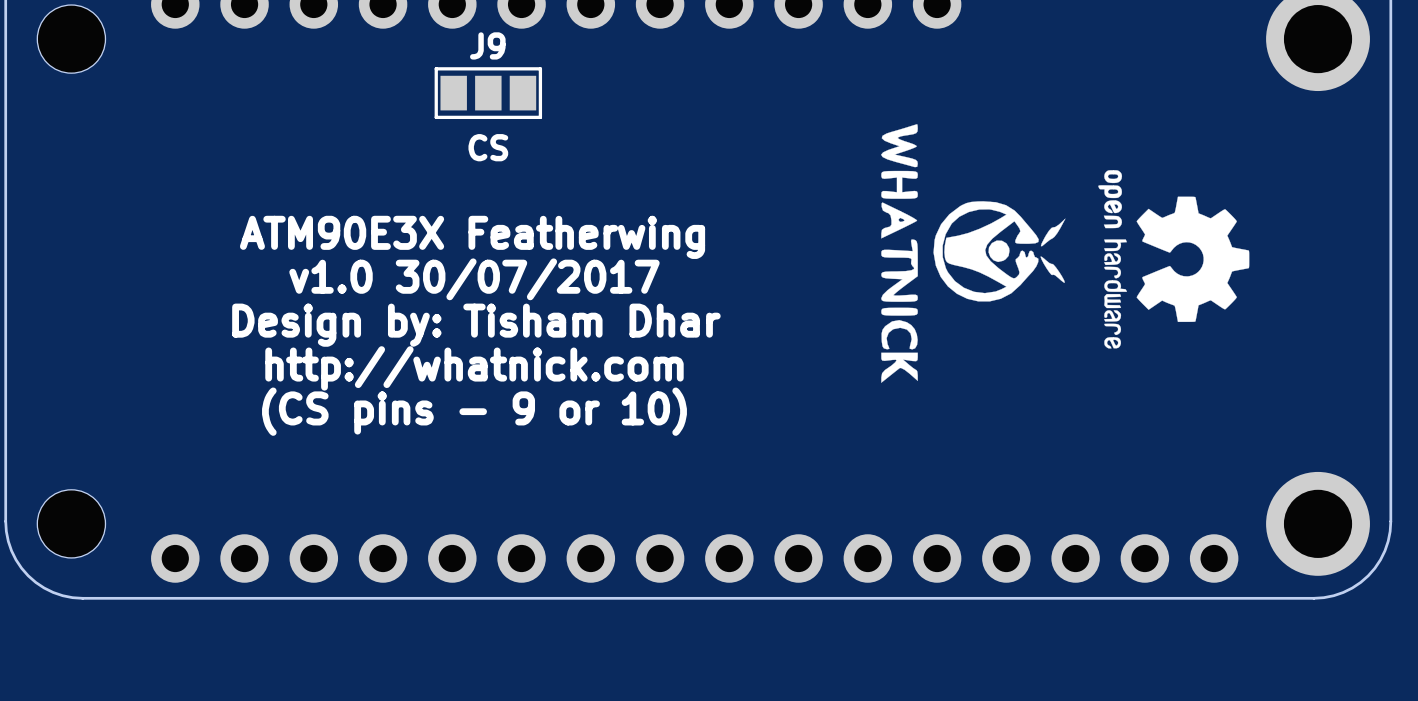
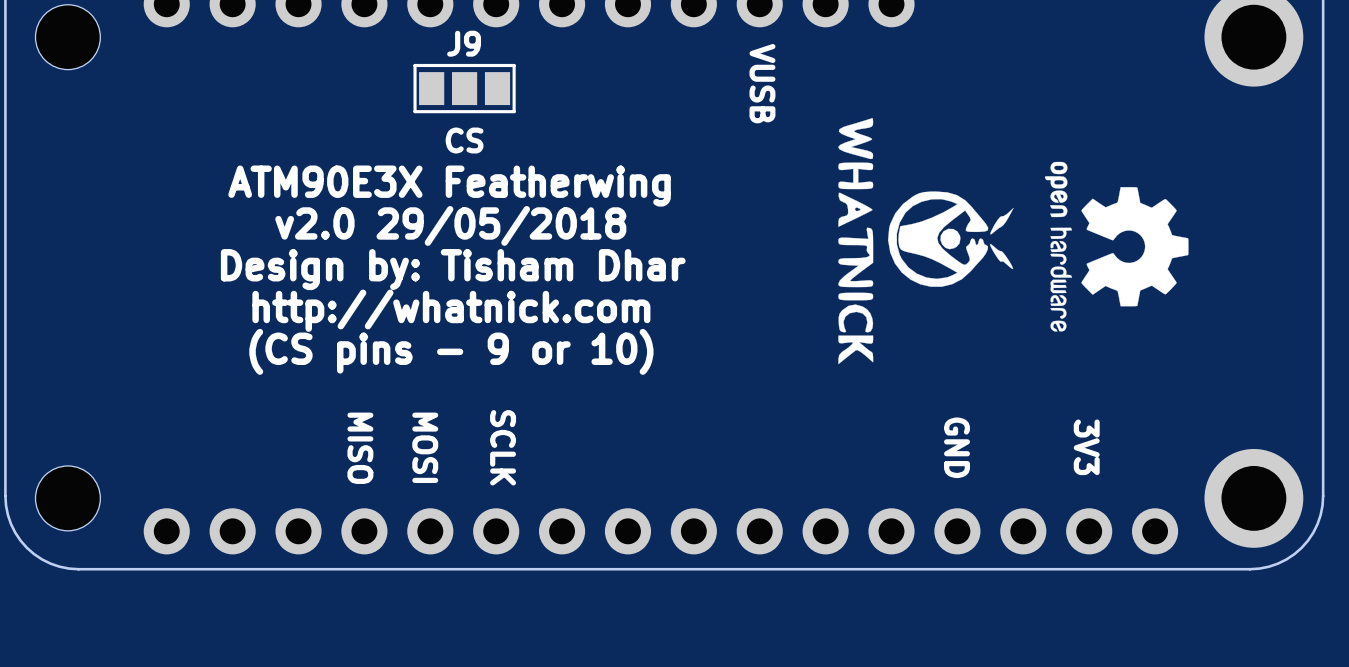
text: none -> VUSB (762, 83)
text: none -> ATM90E3X Featherwing (449, 186)
text: ATM90E3X Featherwing (472, 237) -> v2.0 29/05/2018 (450, 225)
text: v1.0 30/07/2017 (474, 279) -> Design by: Tisham Dhar (453, 269)
text: Design by: Tisham Dhar (476, 325) -> http://whatnick.com (451, 310)
text: http://whatnick.com (474, 368) -> (CS pins - 9 or 10) (451, 351)
text: (CS pins - 9 or 10) (474, 411) -> none
text: none -> MOSI (425, 447)
text: none -> SCLK (503, 447)
text: none -> GND (957, 447)
text: none -> 3V3 (1086, 447)
text: none -> MISO (360, 448)

